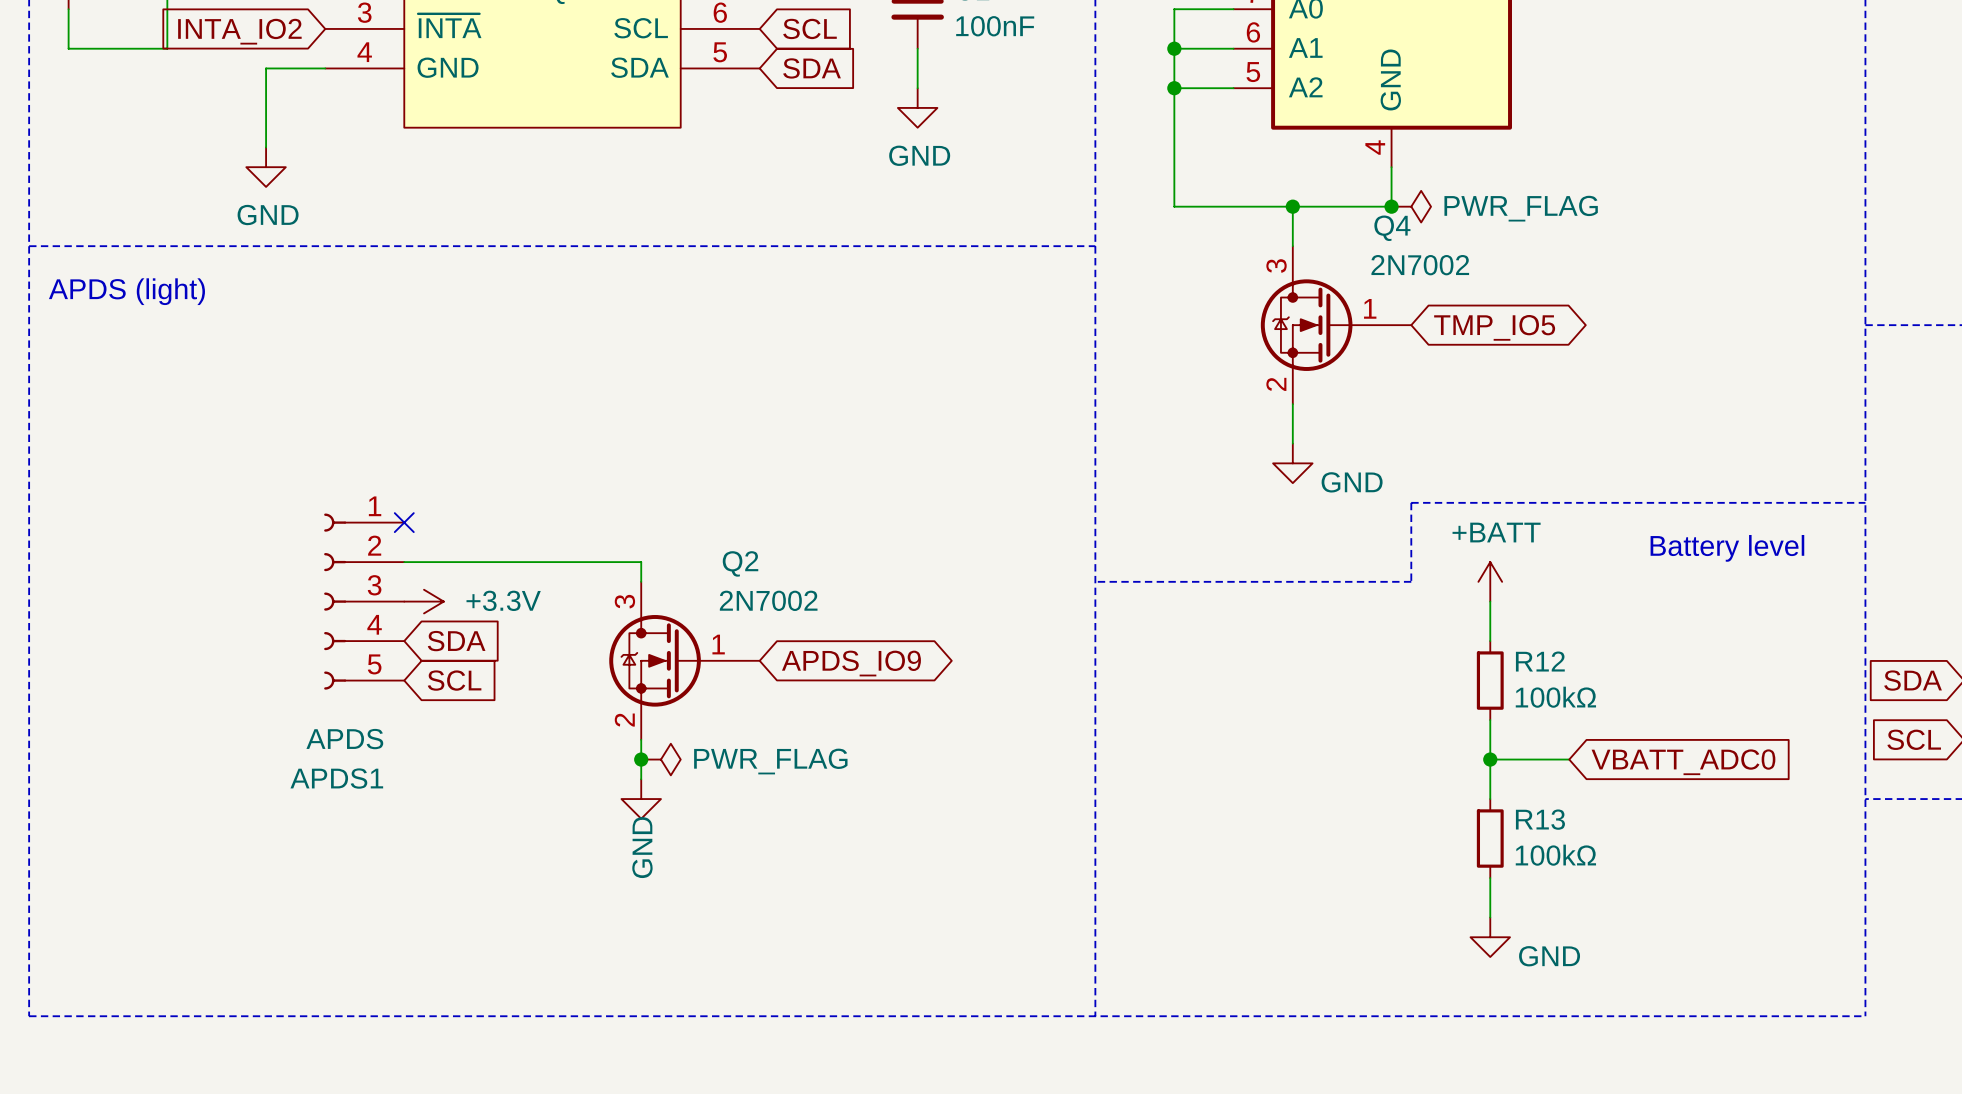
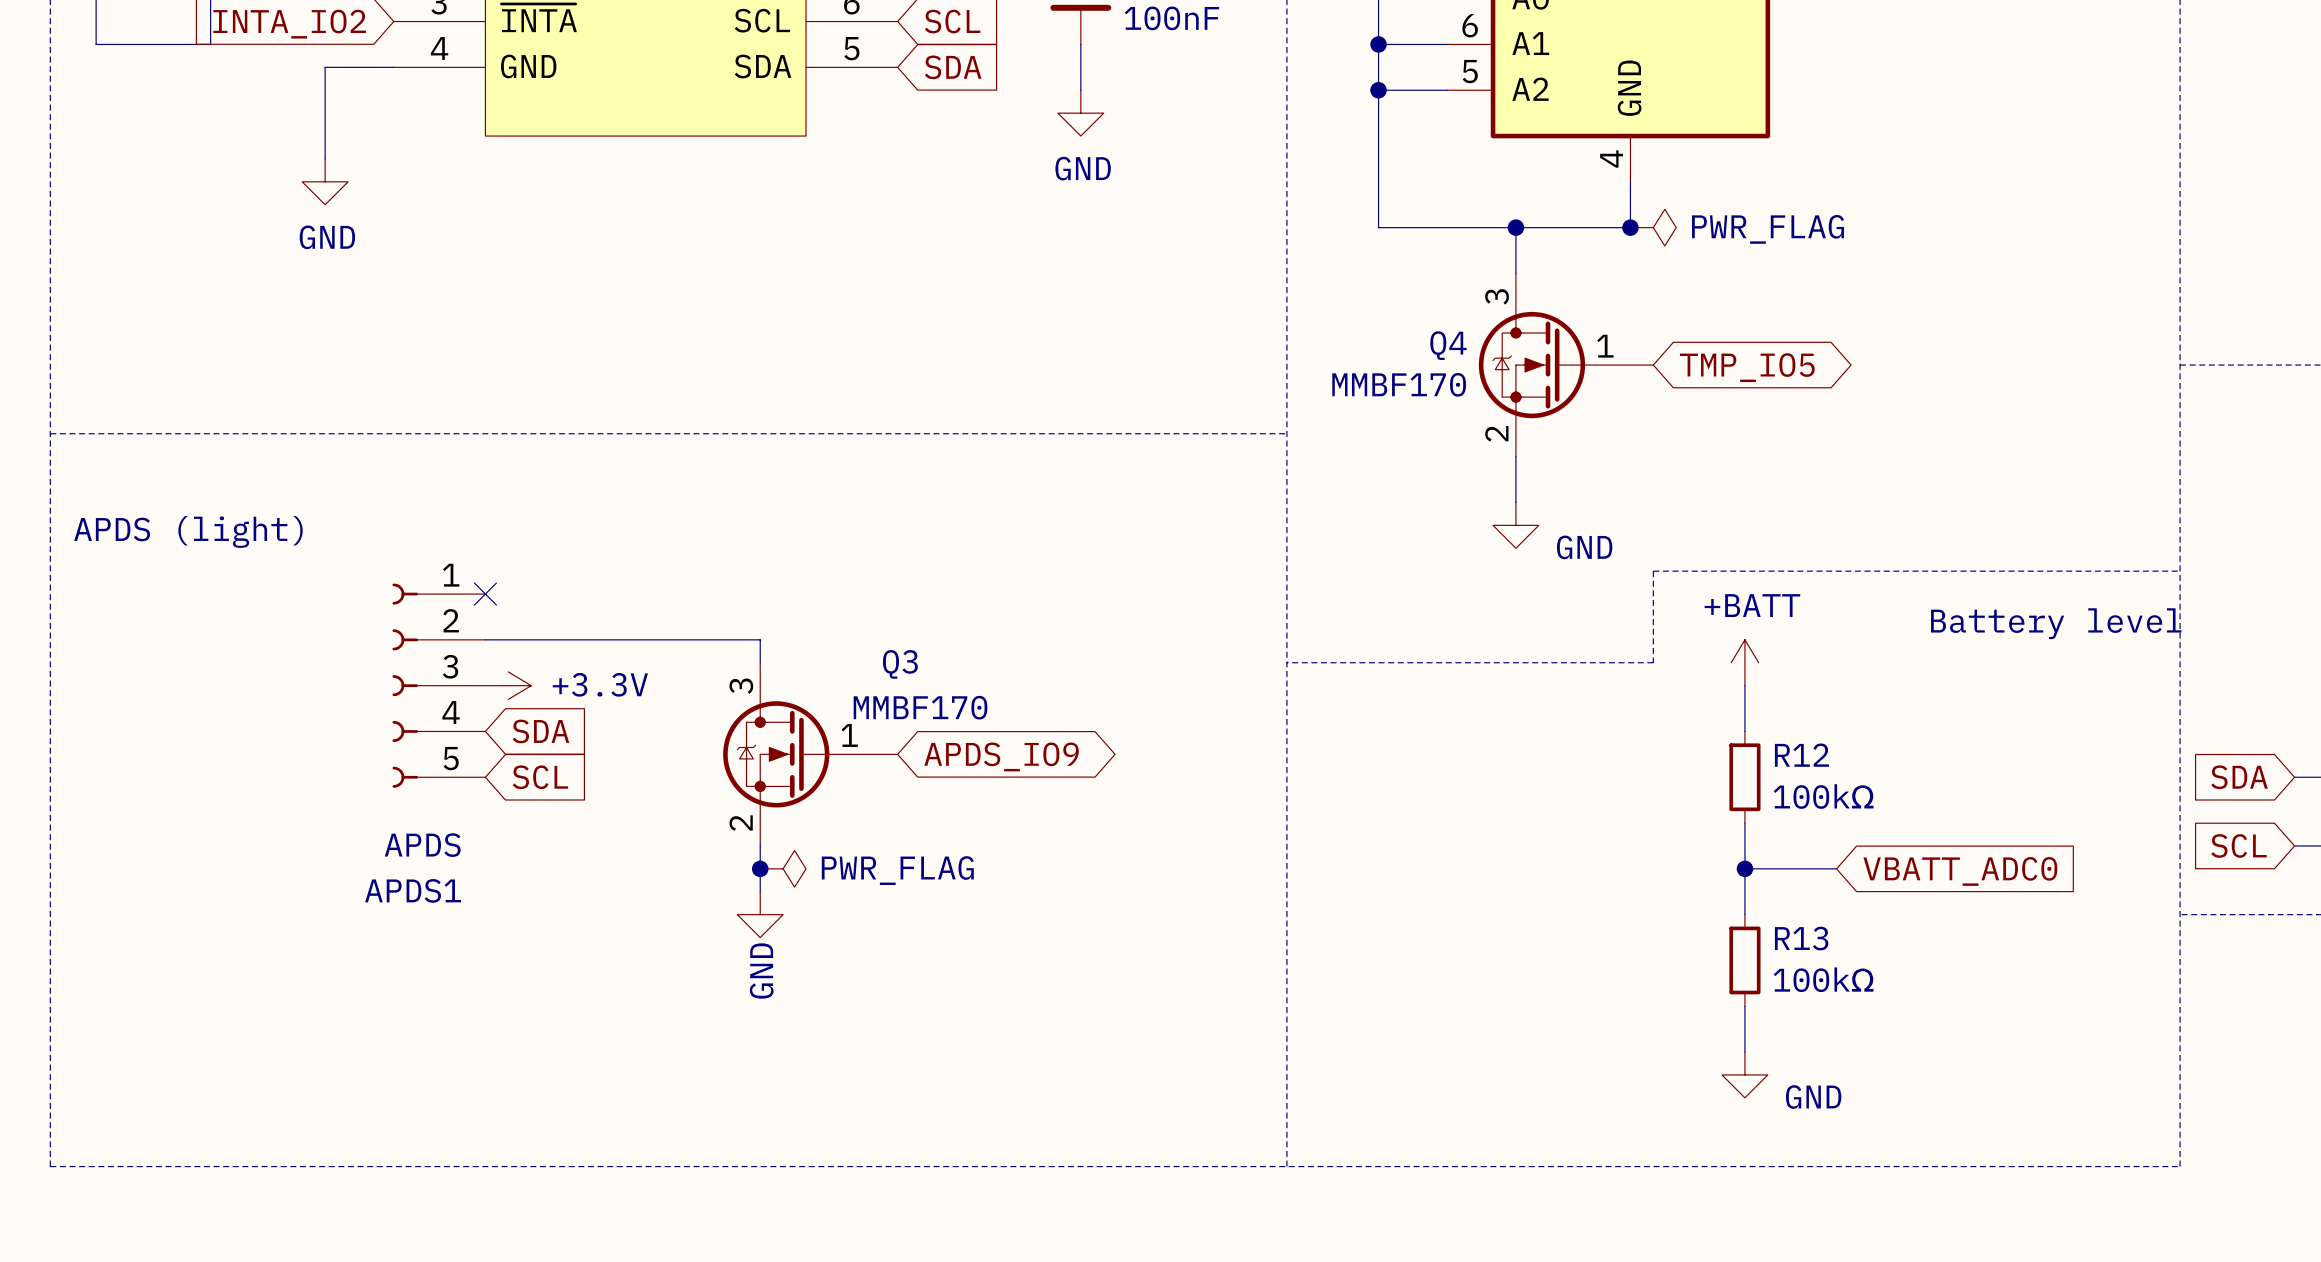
Q4 name position: Q4 (1392, 228) -> Q4 (1448, 345)
line: (29, 246) (1095, 246) -> (50, 433) (1286, 433)
Q4 value: 2N7002 (1420, 265) -> MMBF170 (1399, 384)
text position: APDS (light) (126, 291) -> APDS (light) (188, 531)
Q2 name: Q2 (740, 563) -> Q3 (900, 664)
Q2 value: 2N7002 (768, 600) -> MMBF170 (920, 707)

